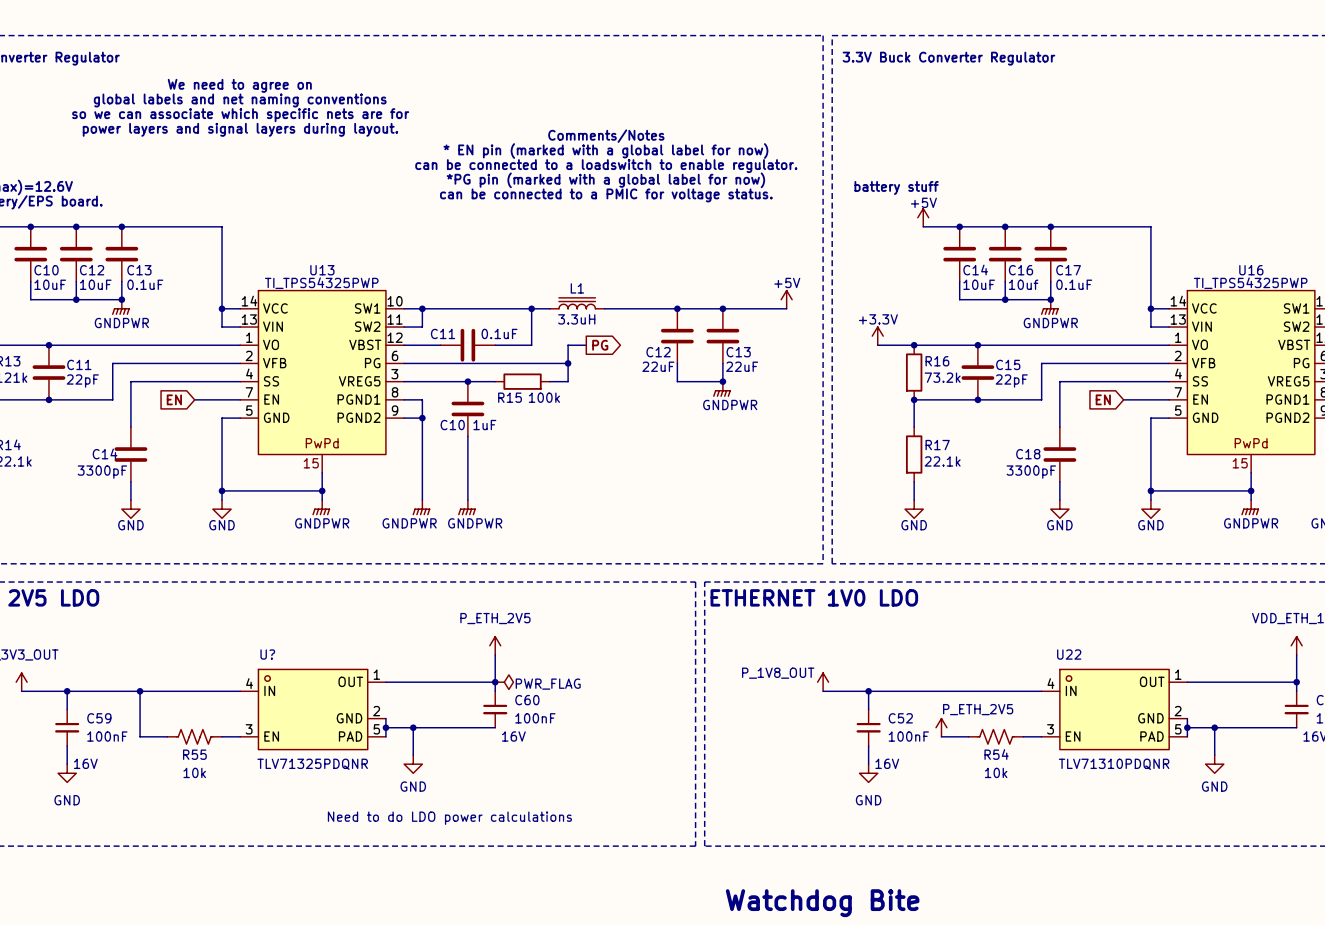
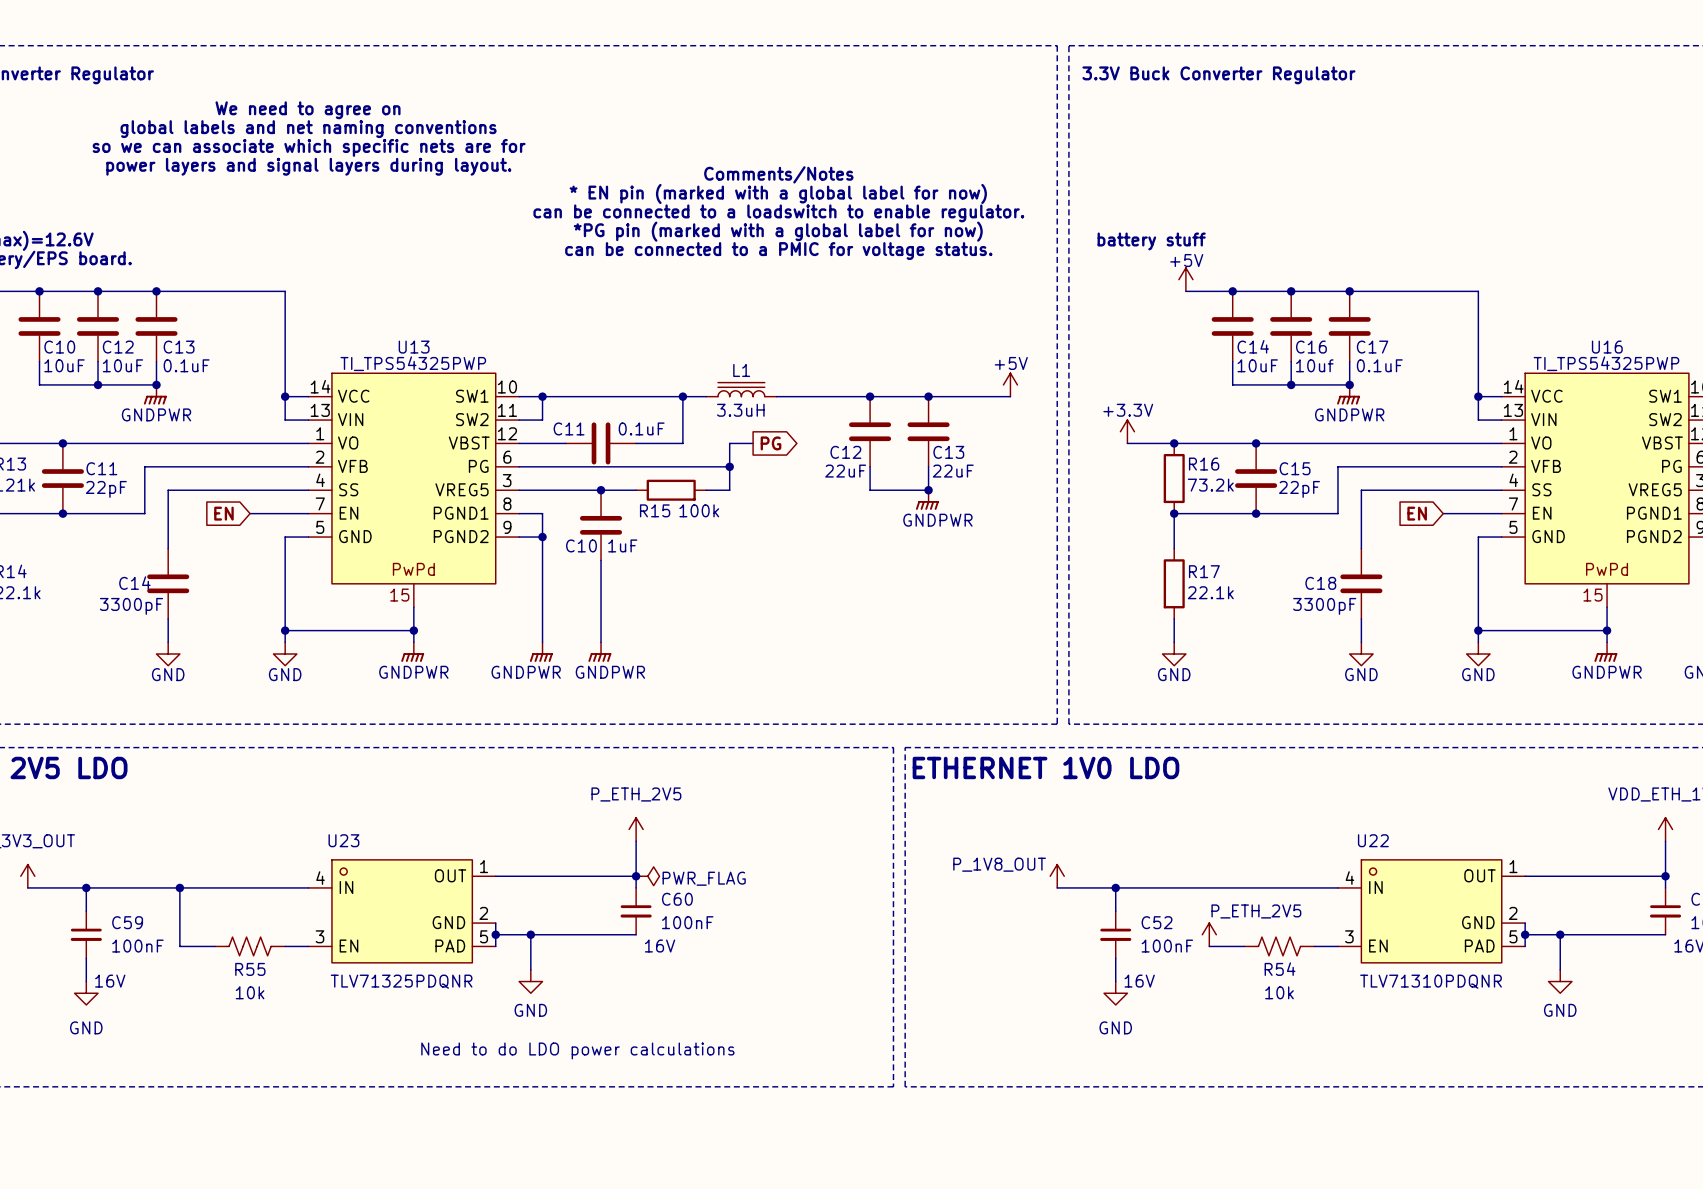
U? name: U? (267, 654) -> U23 (343, 840)
text: Watchdog Bite (822, 903) -> none

